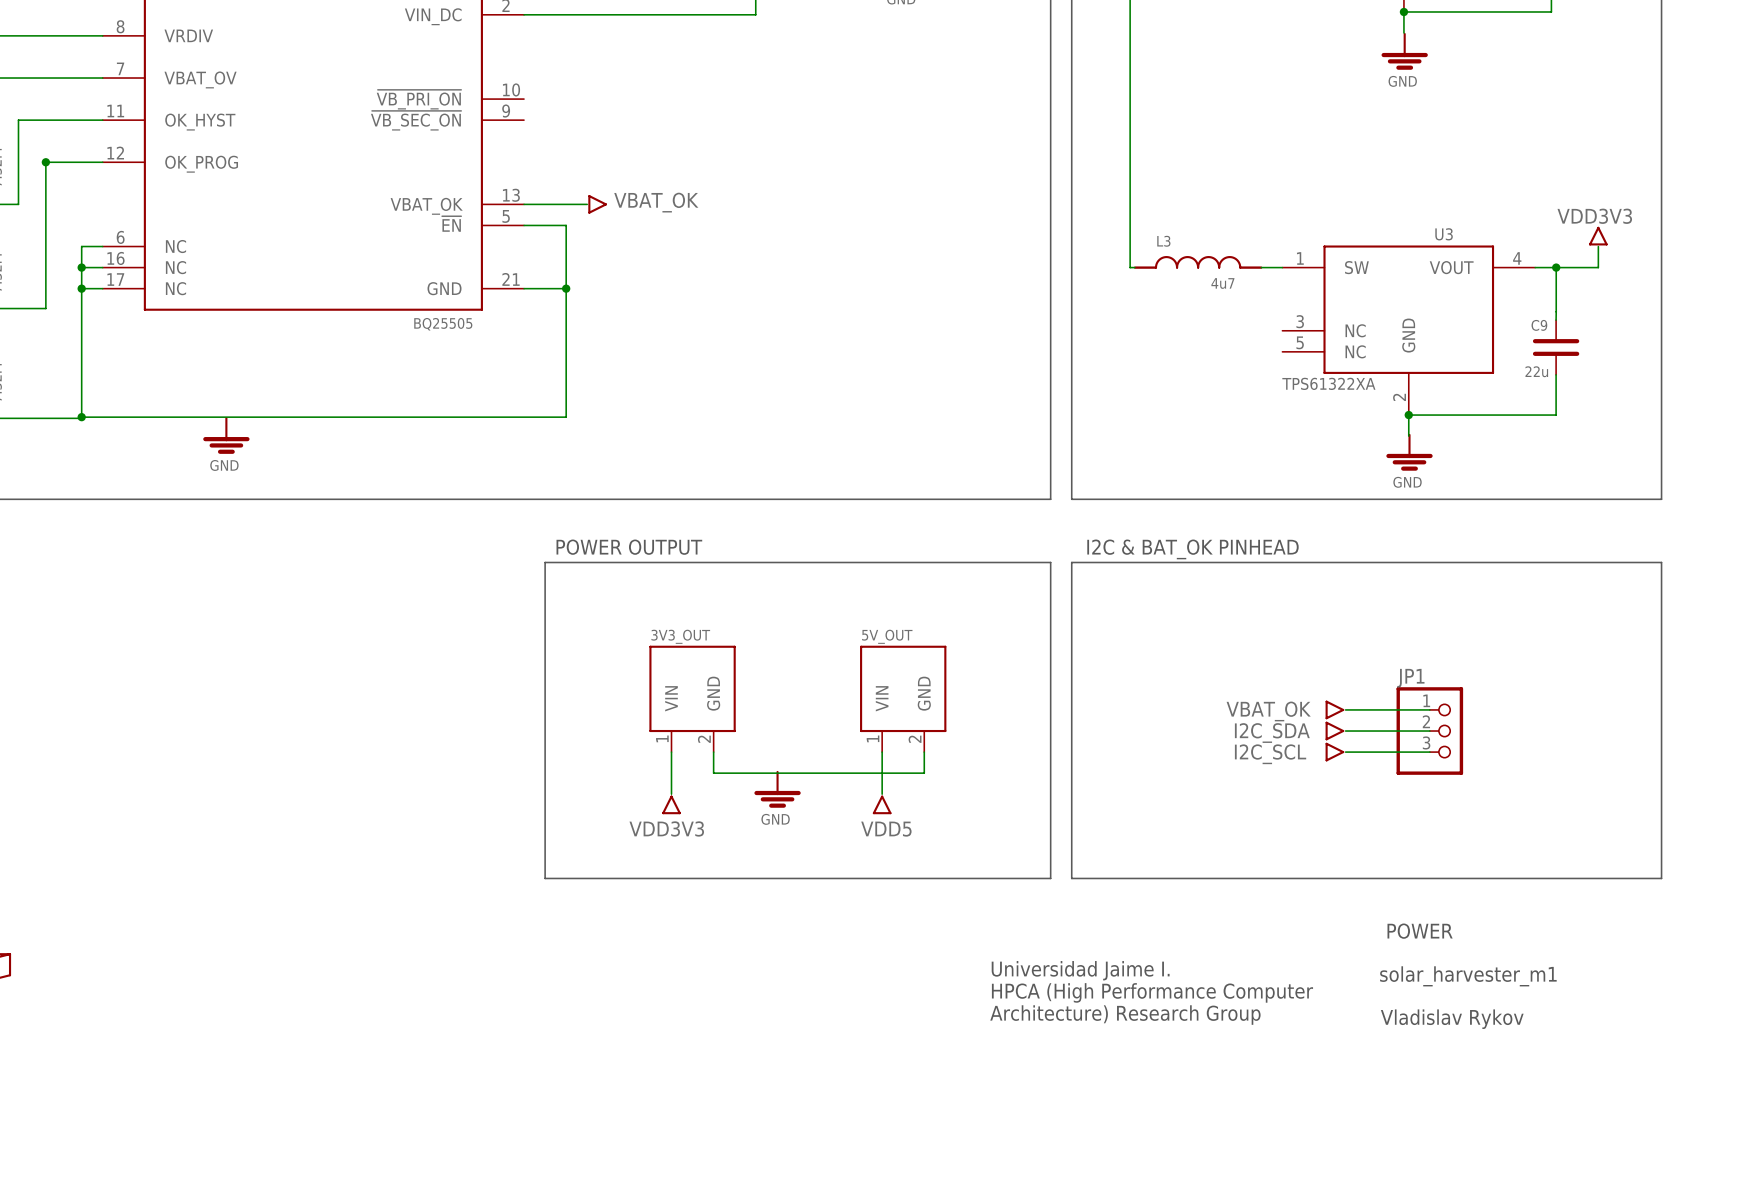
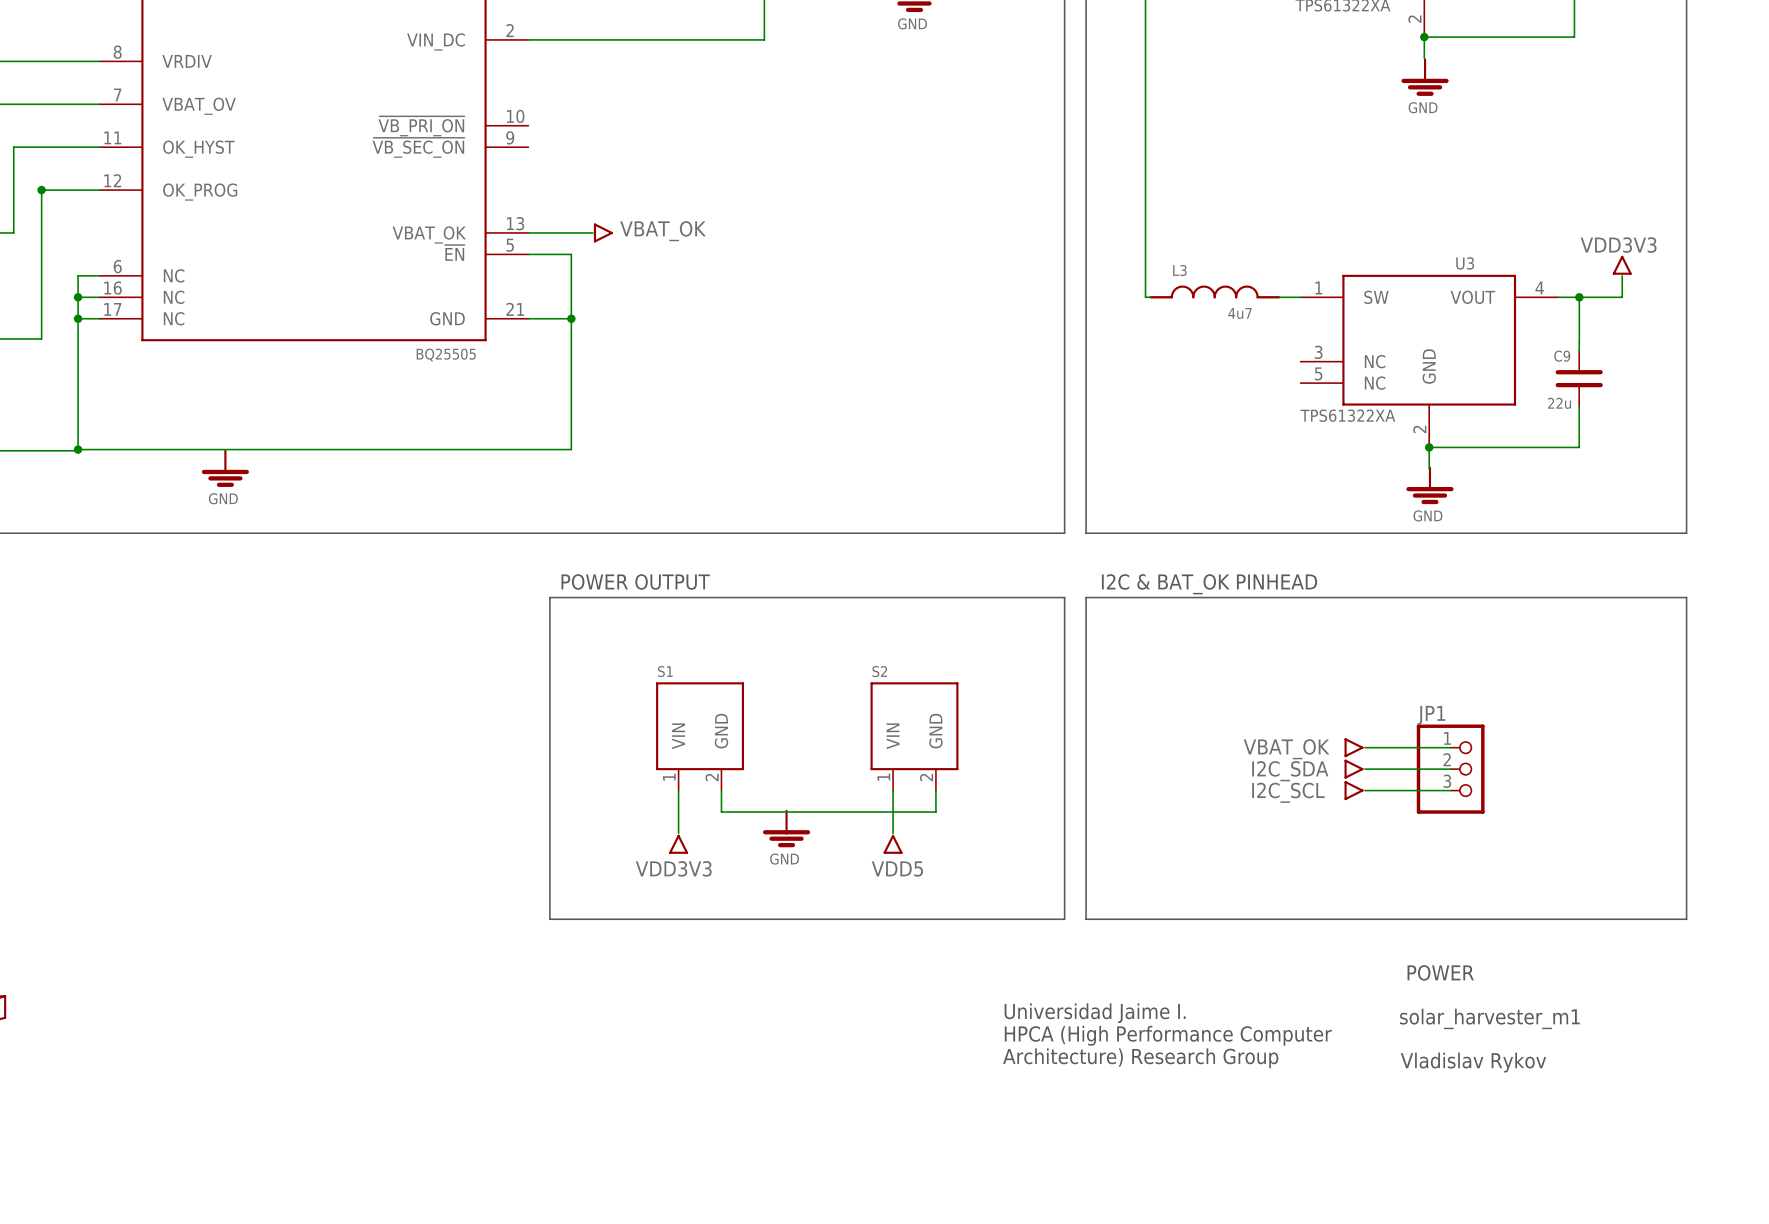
3V3_OUT name: 3V3_OUT (680, 636) -> S1 (665, 671)
5V_OUT name: 5V_OUT (887, 636) -> S2 (879, 671)

